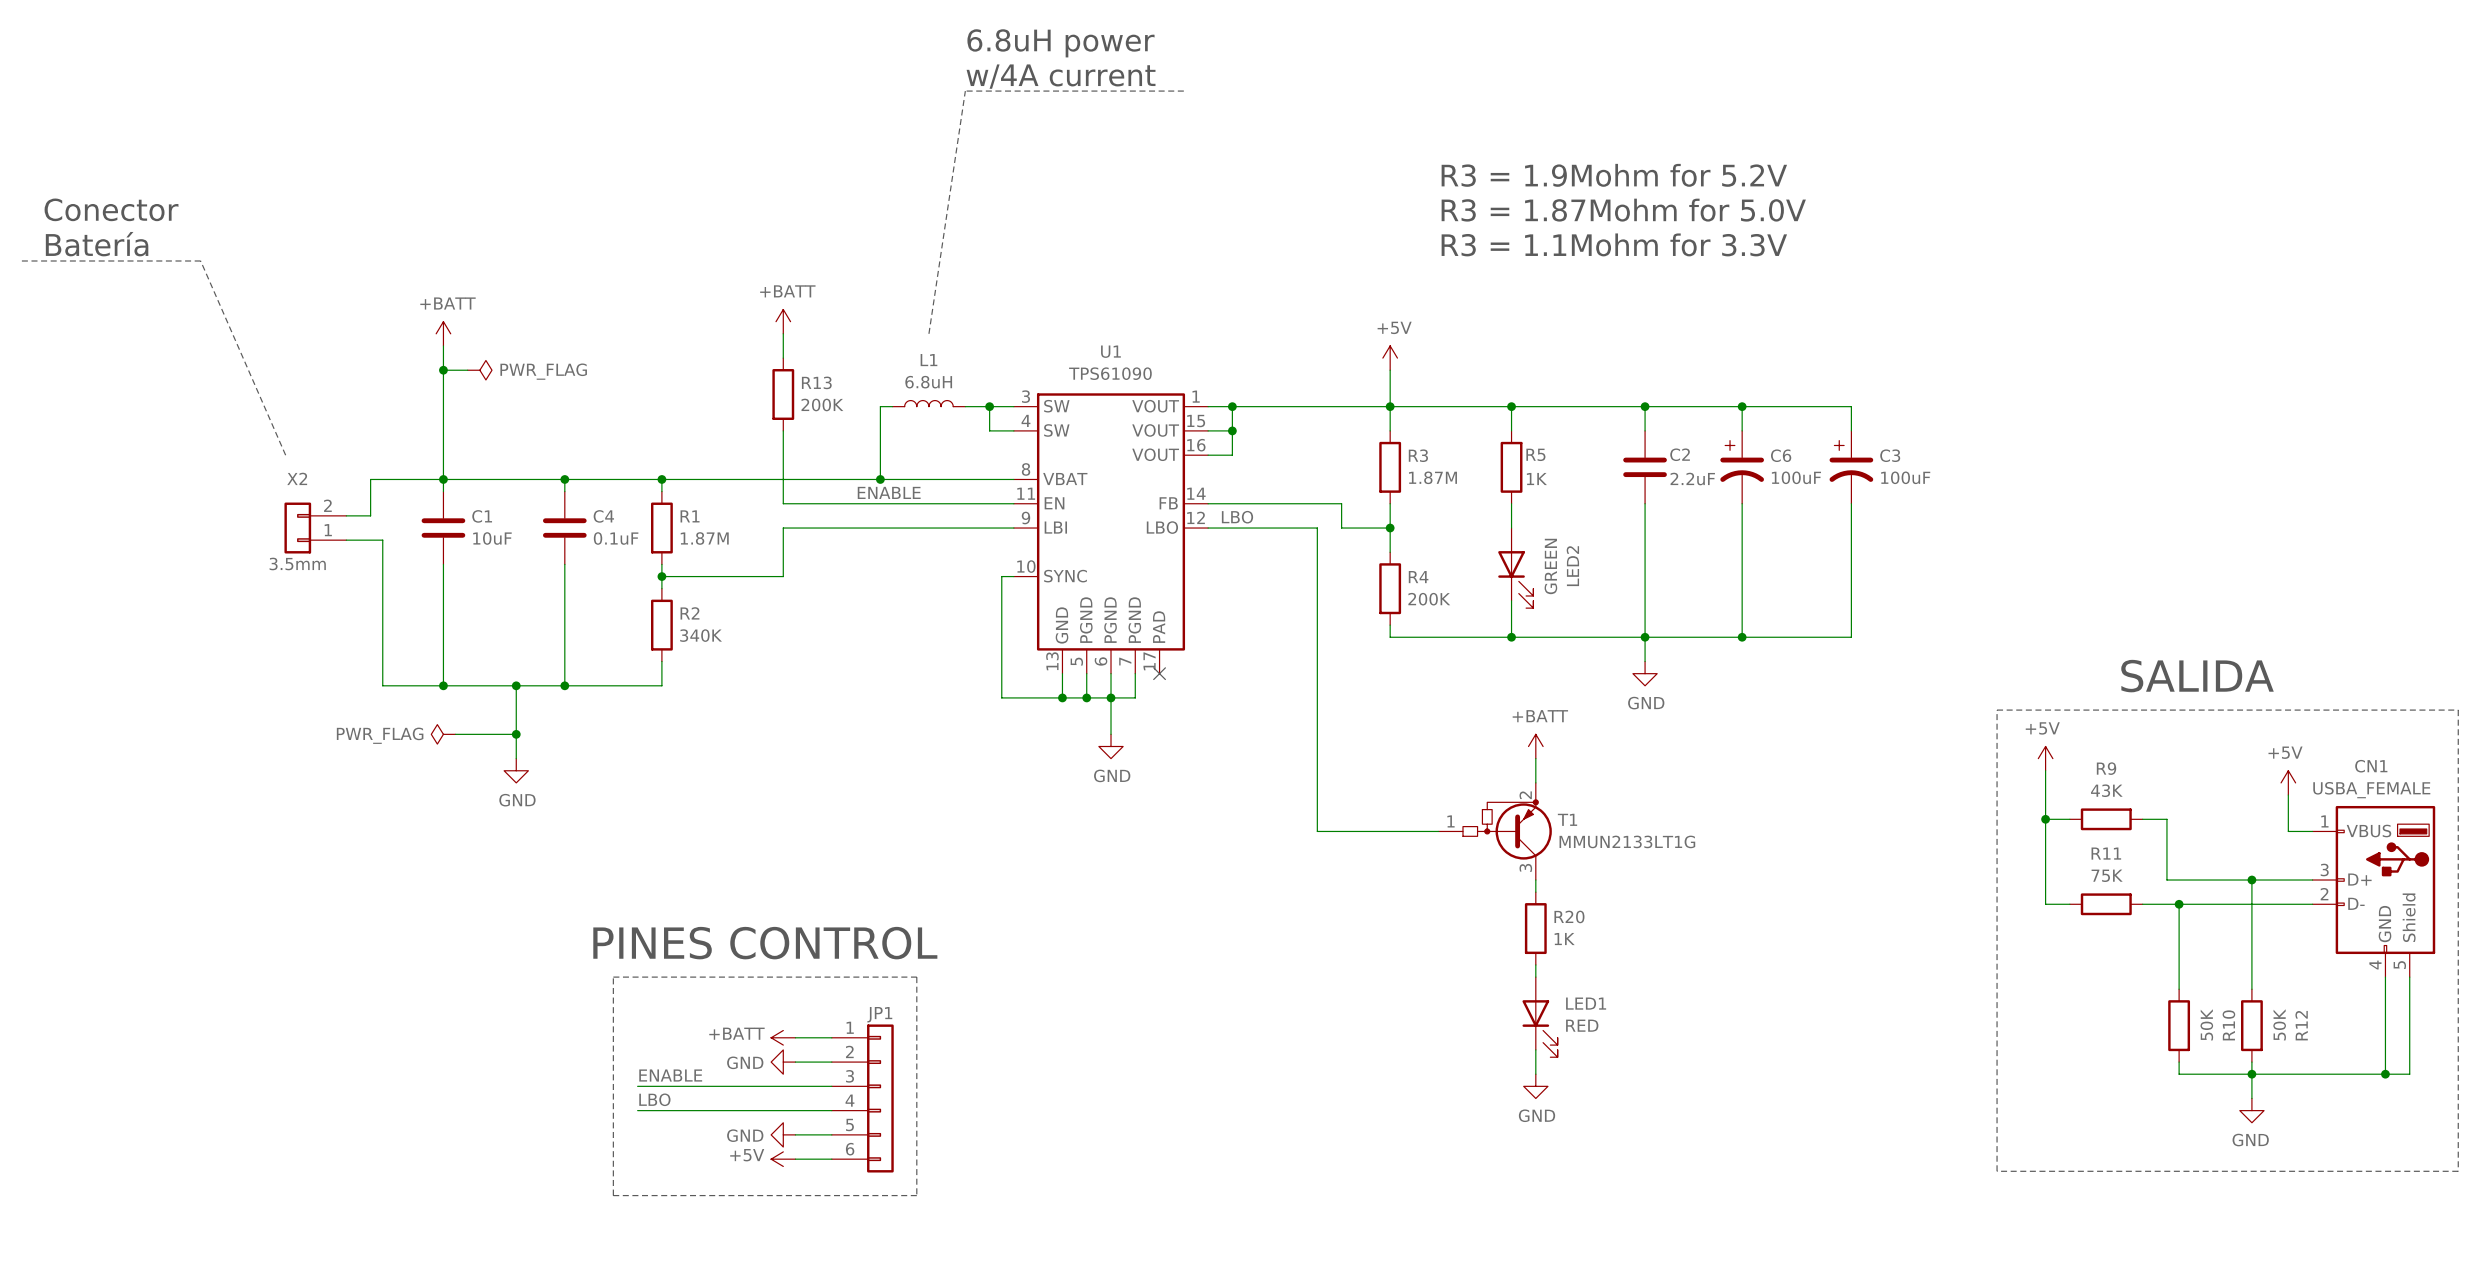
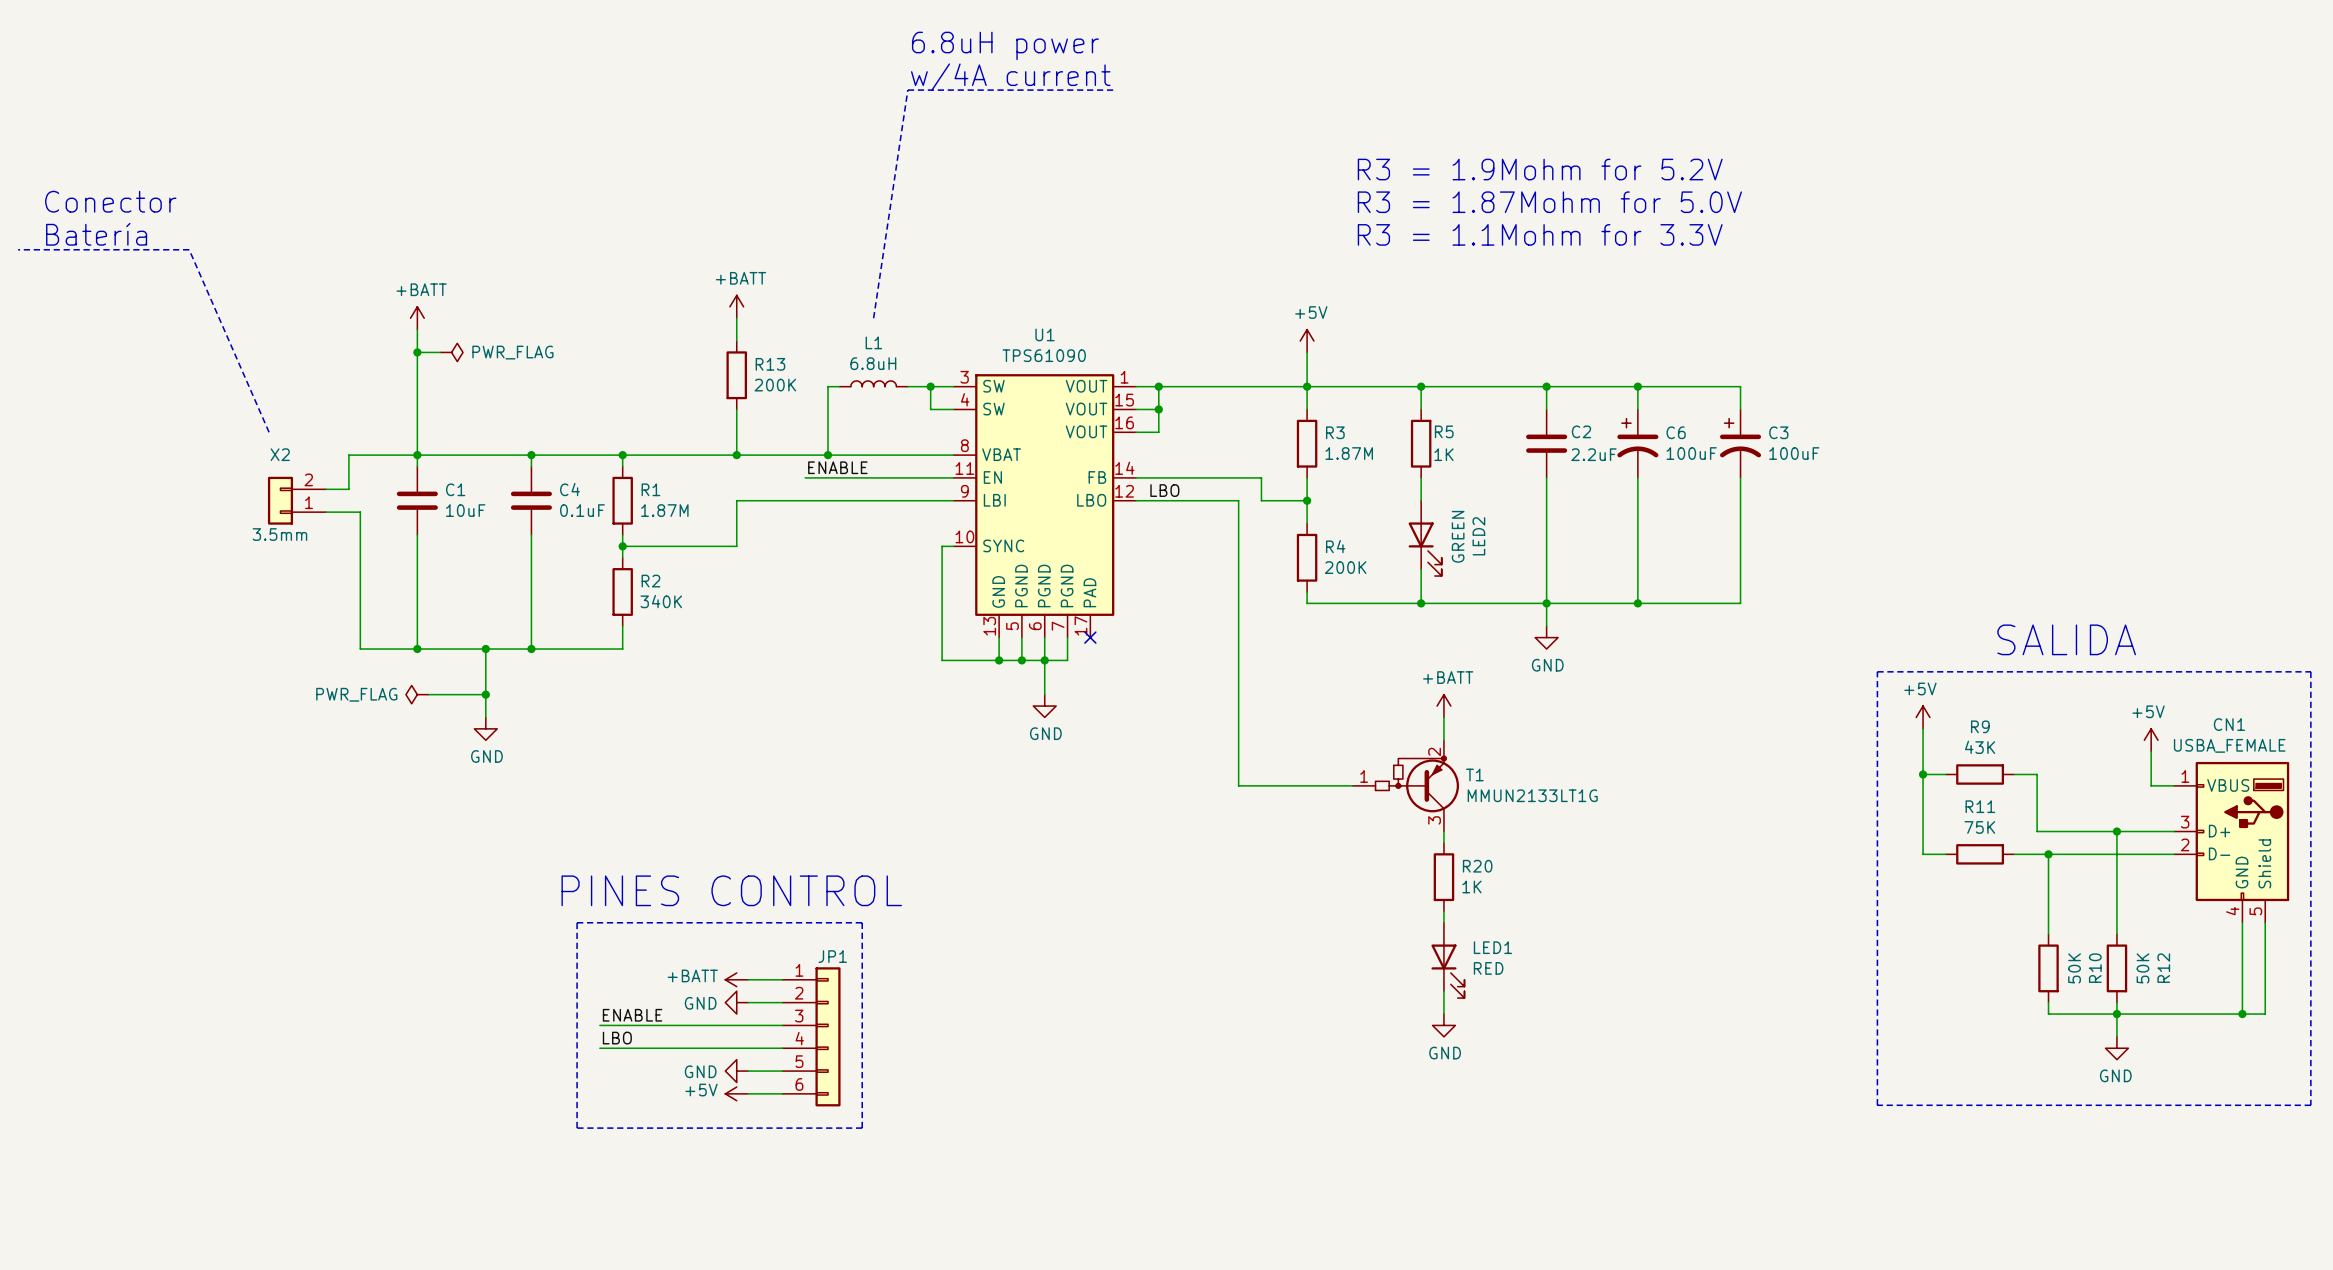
wire: (783, 479) (783, 503) (856, 503) -> none
junction: none -> (736, 455)

